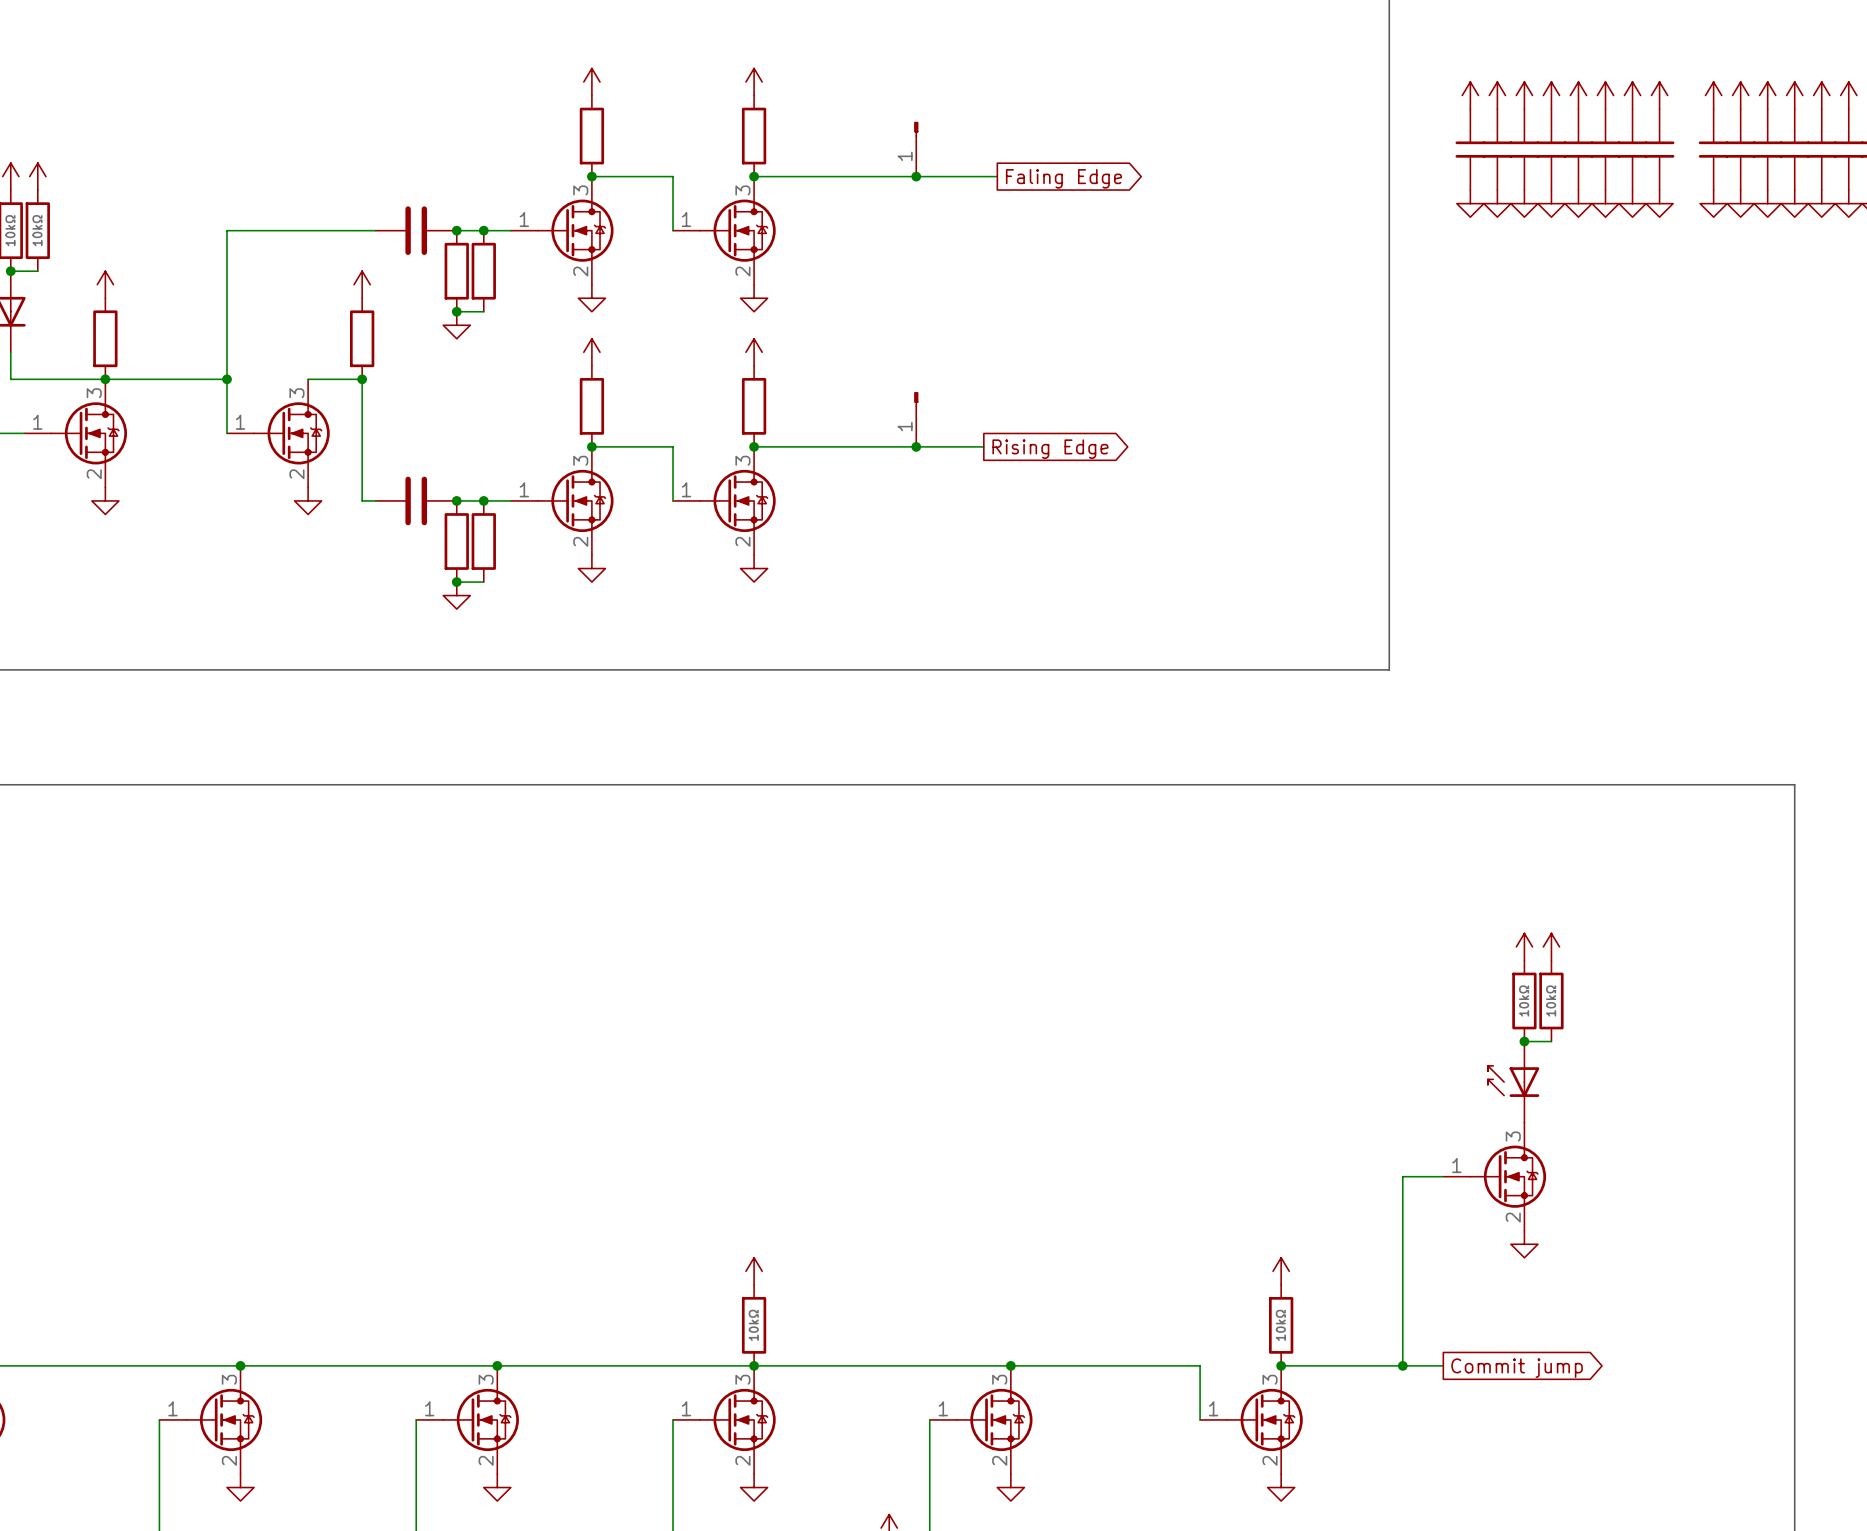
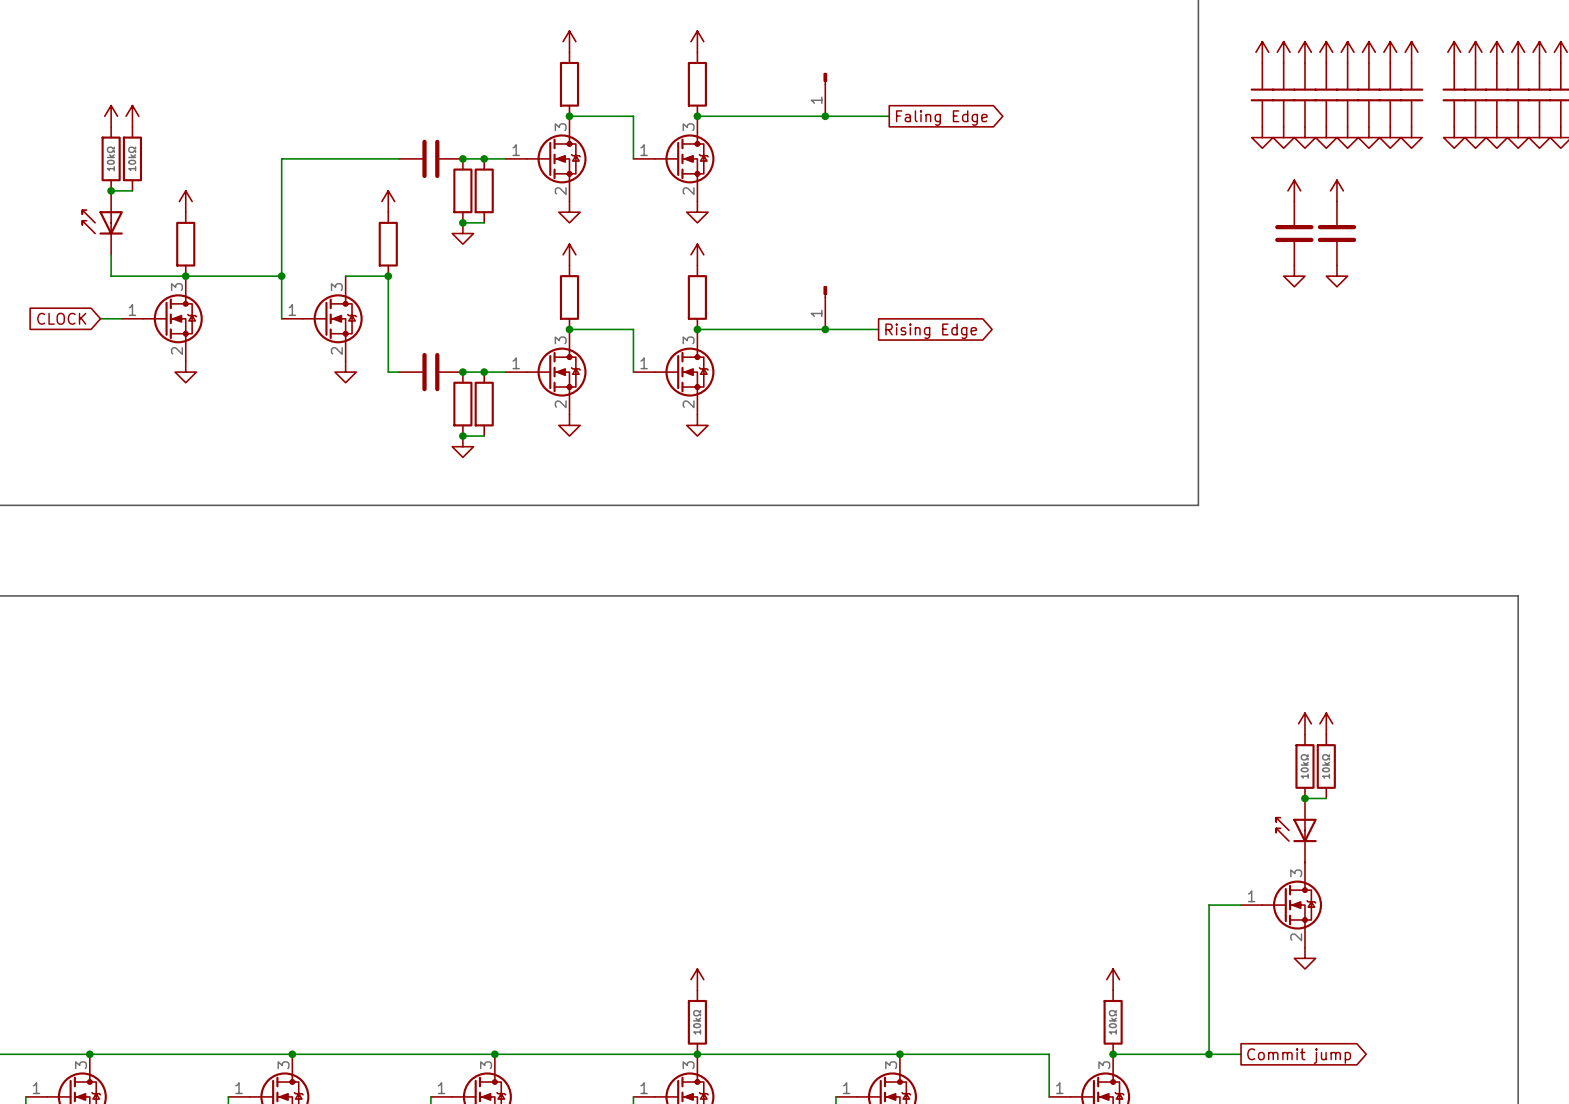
power symbol: none -> (1294, 190)
power symbol: none -> (1336, 190)
part: none -> (1294, 233)
part: none -> (1336, 233)
power symbol: none -> (1294, 276)
power symbol: none -> (1336, 276)

